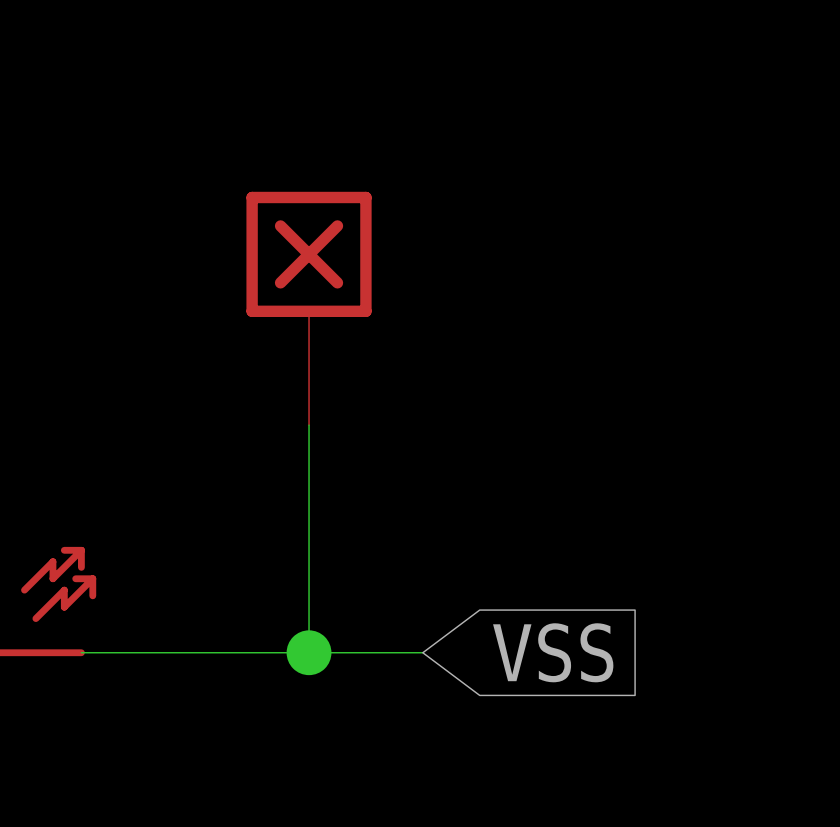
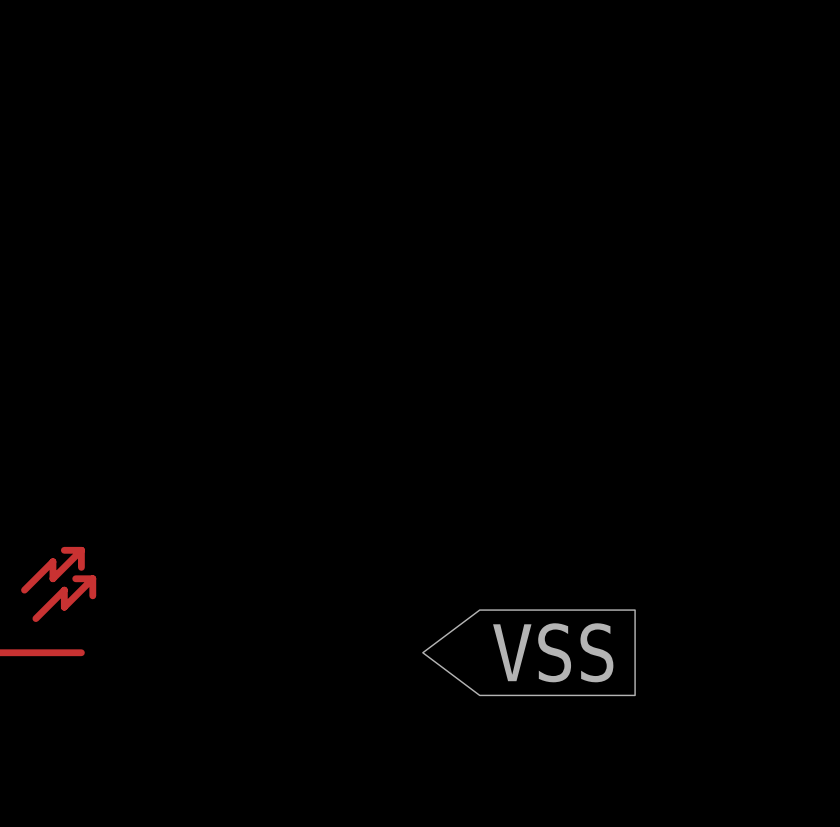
part: (309, 308) -> none
wire: (309, 425) (309, 652) -> none
wire: (81, 652) (422, 652) -> none
junction: (309, 652) -> none

